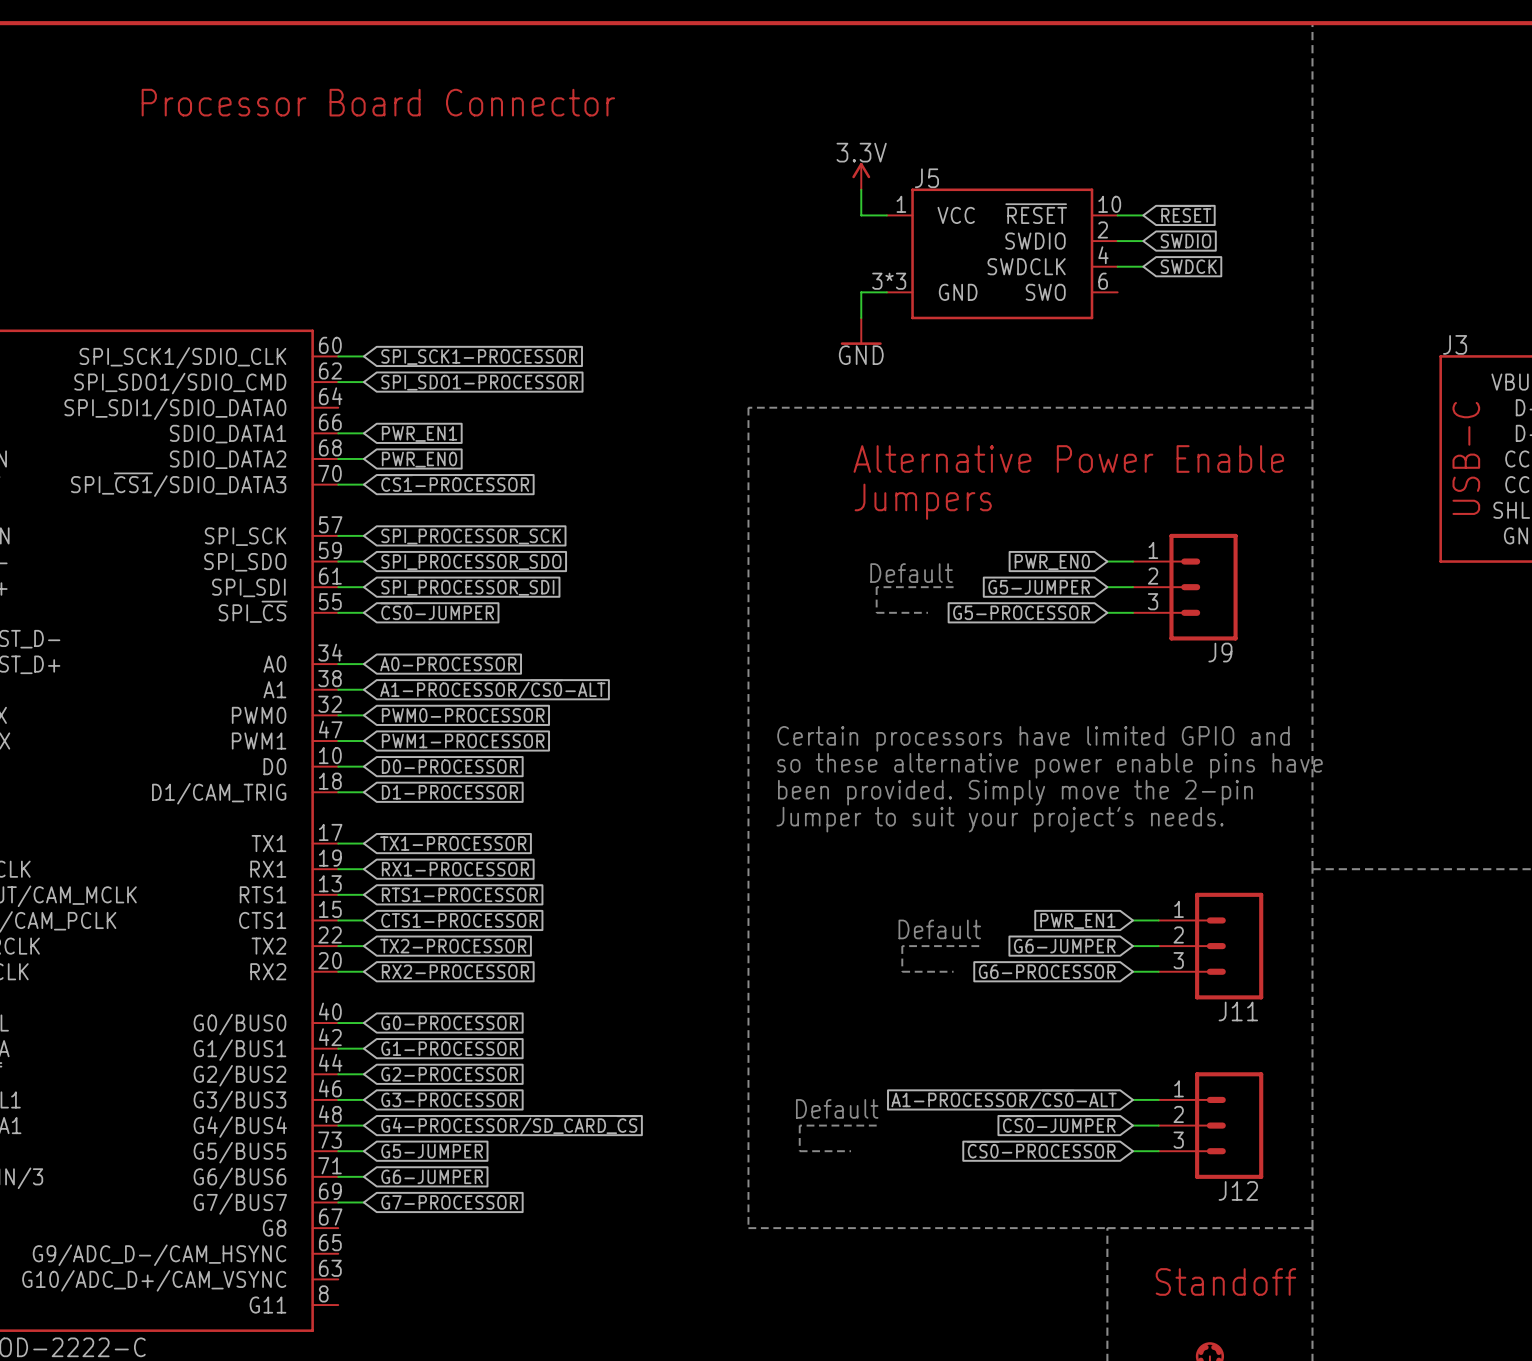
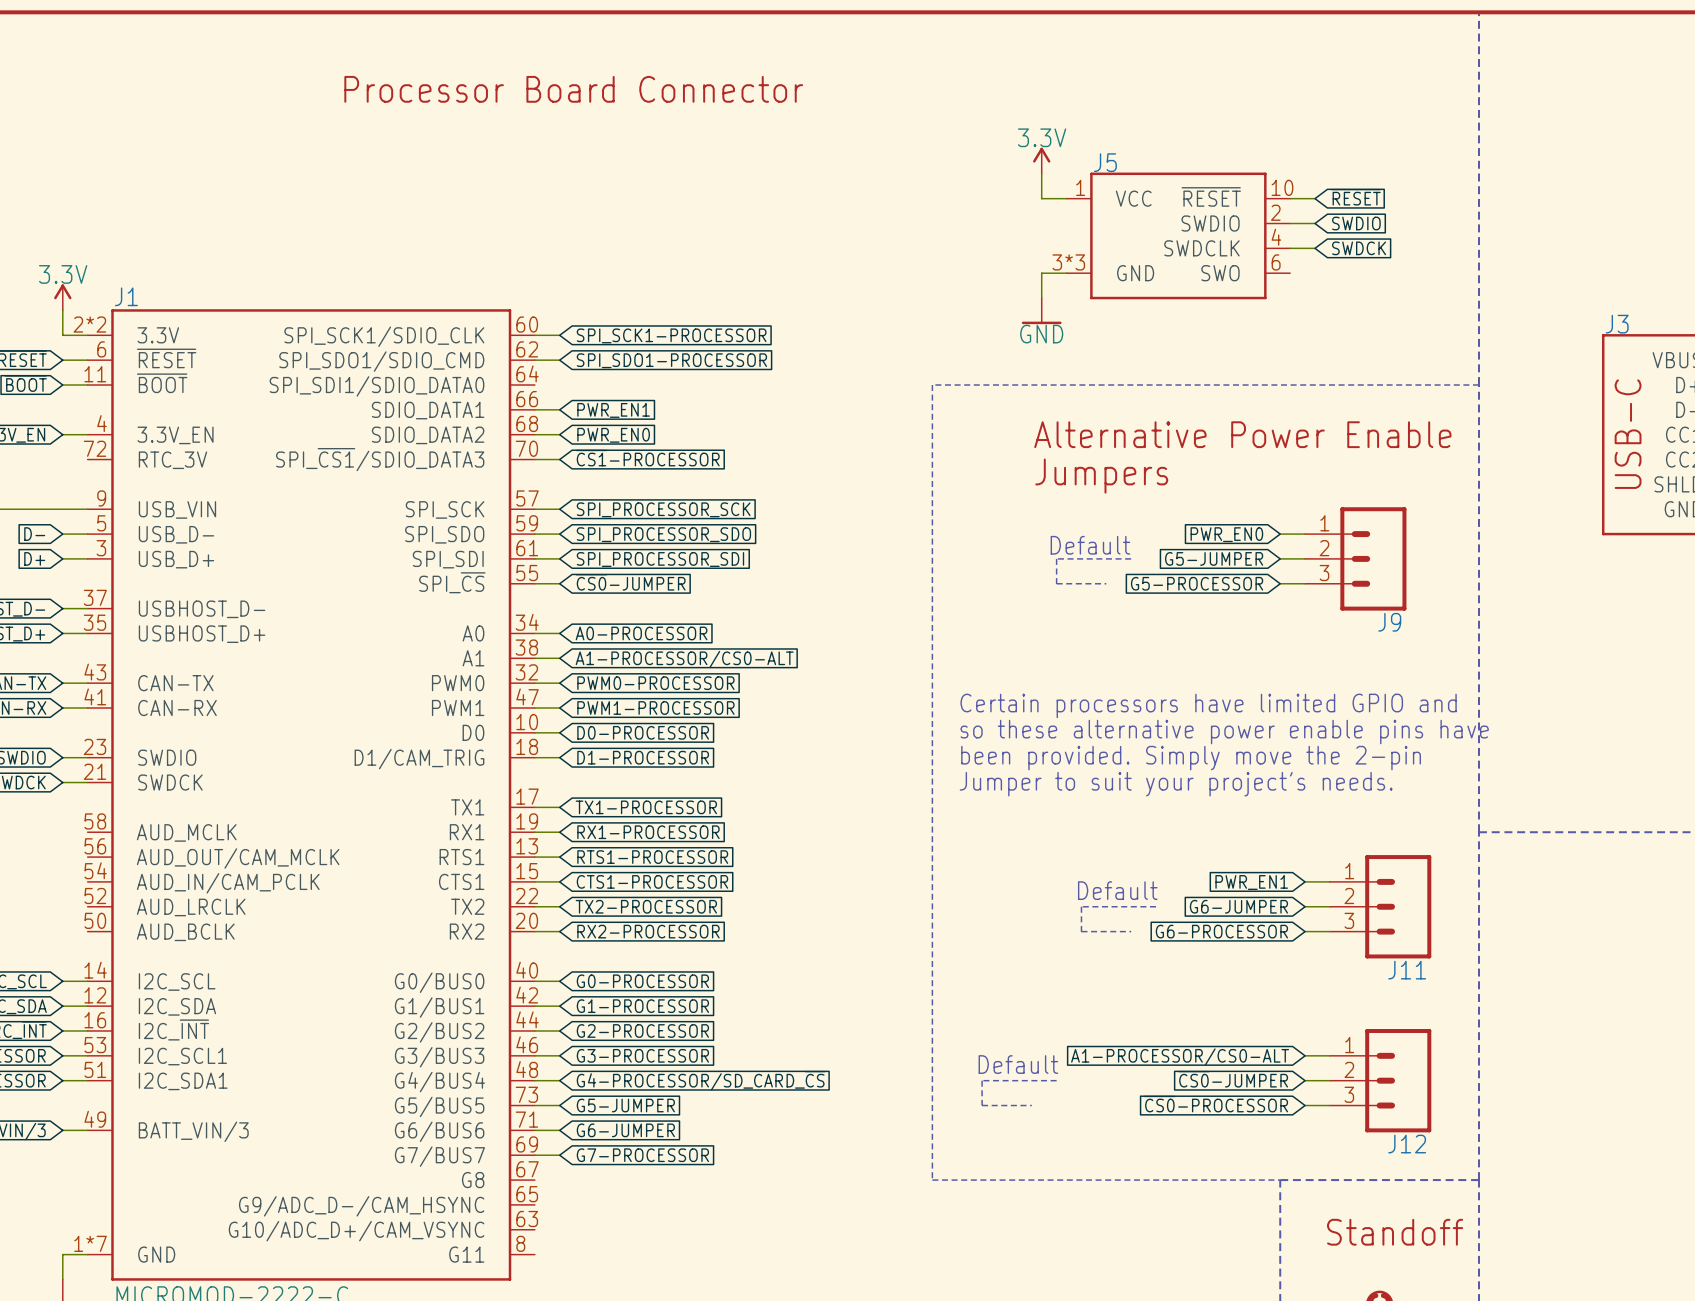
global label: A1-PROCESSOR/~{CS0}-ALT (492, 689) -> A1-PROCESSOR/CS0-ALT (684, 659)
global label: A1-PROCESSOR/~{CS0}-ALT (1004, 1099) -> A1-PROCESSOR/CS0-ALT (1180, 1057)

